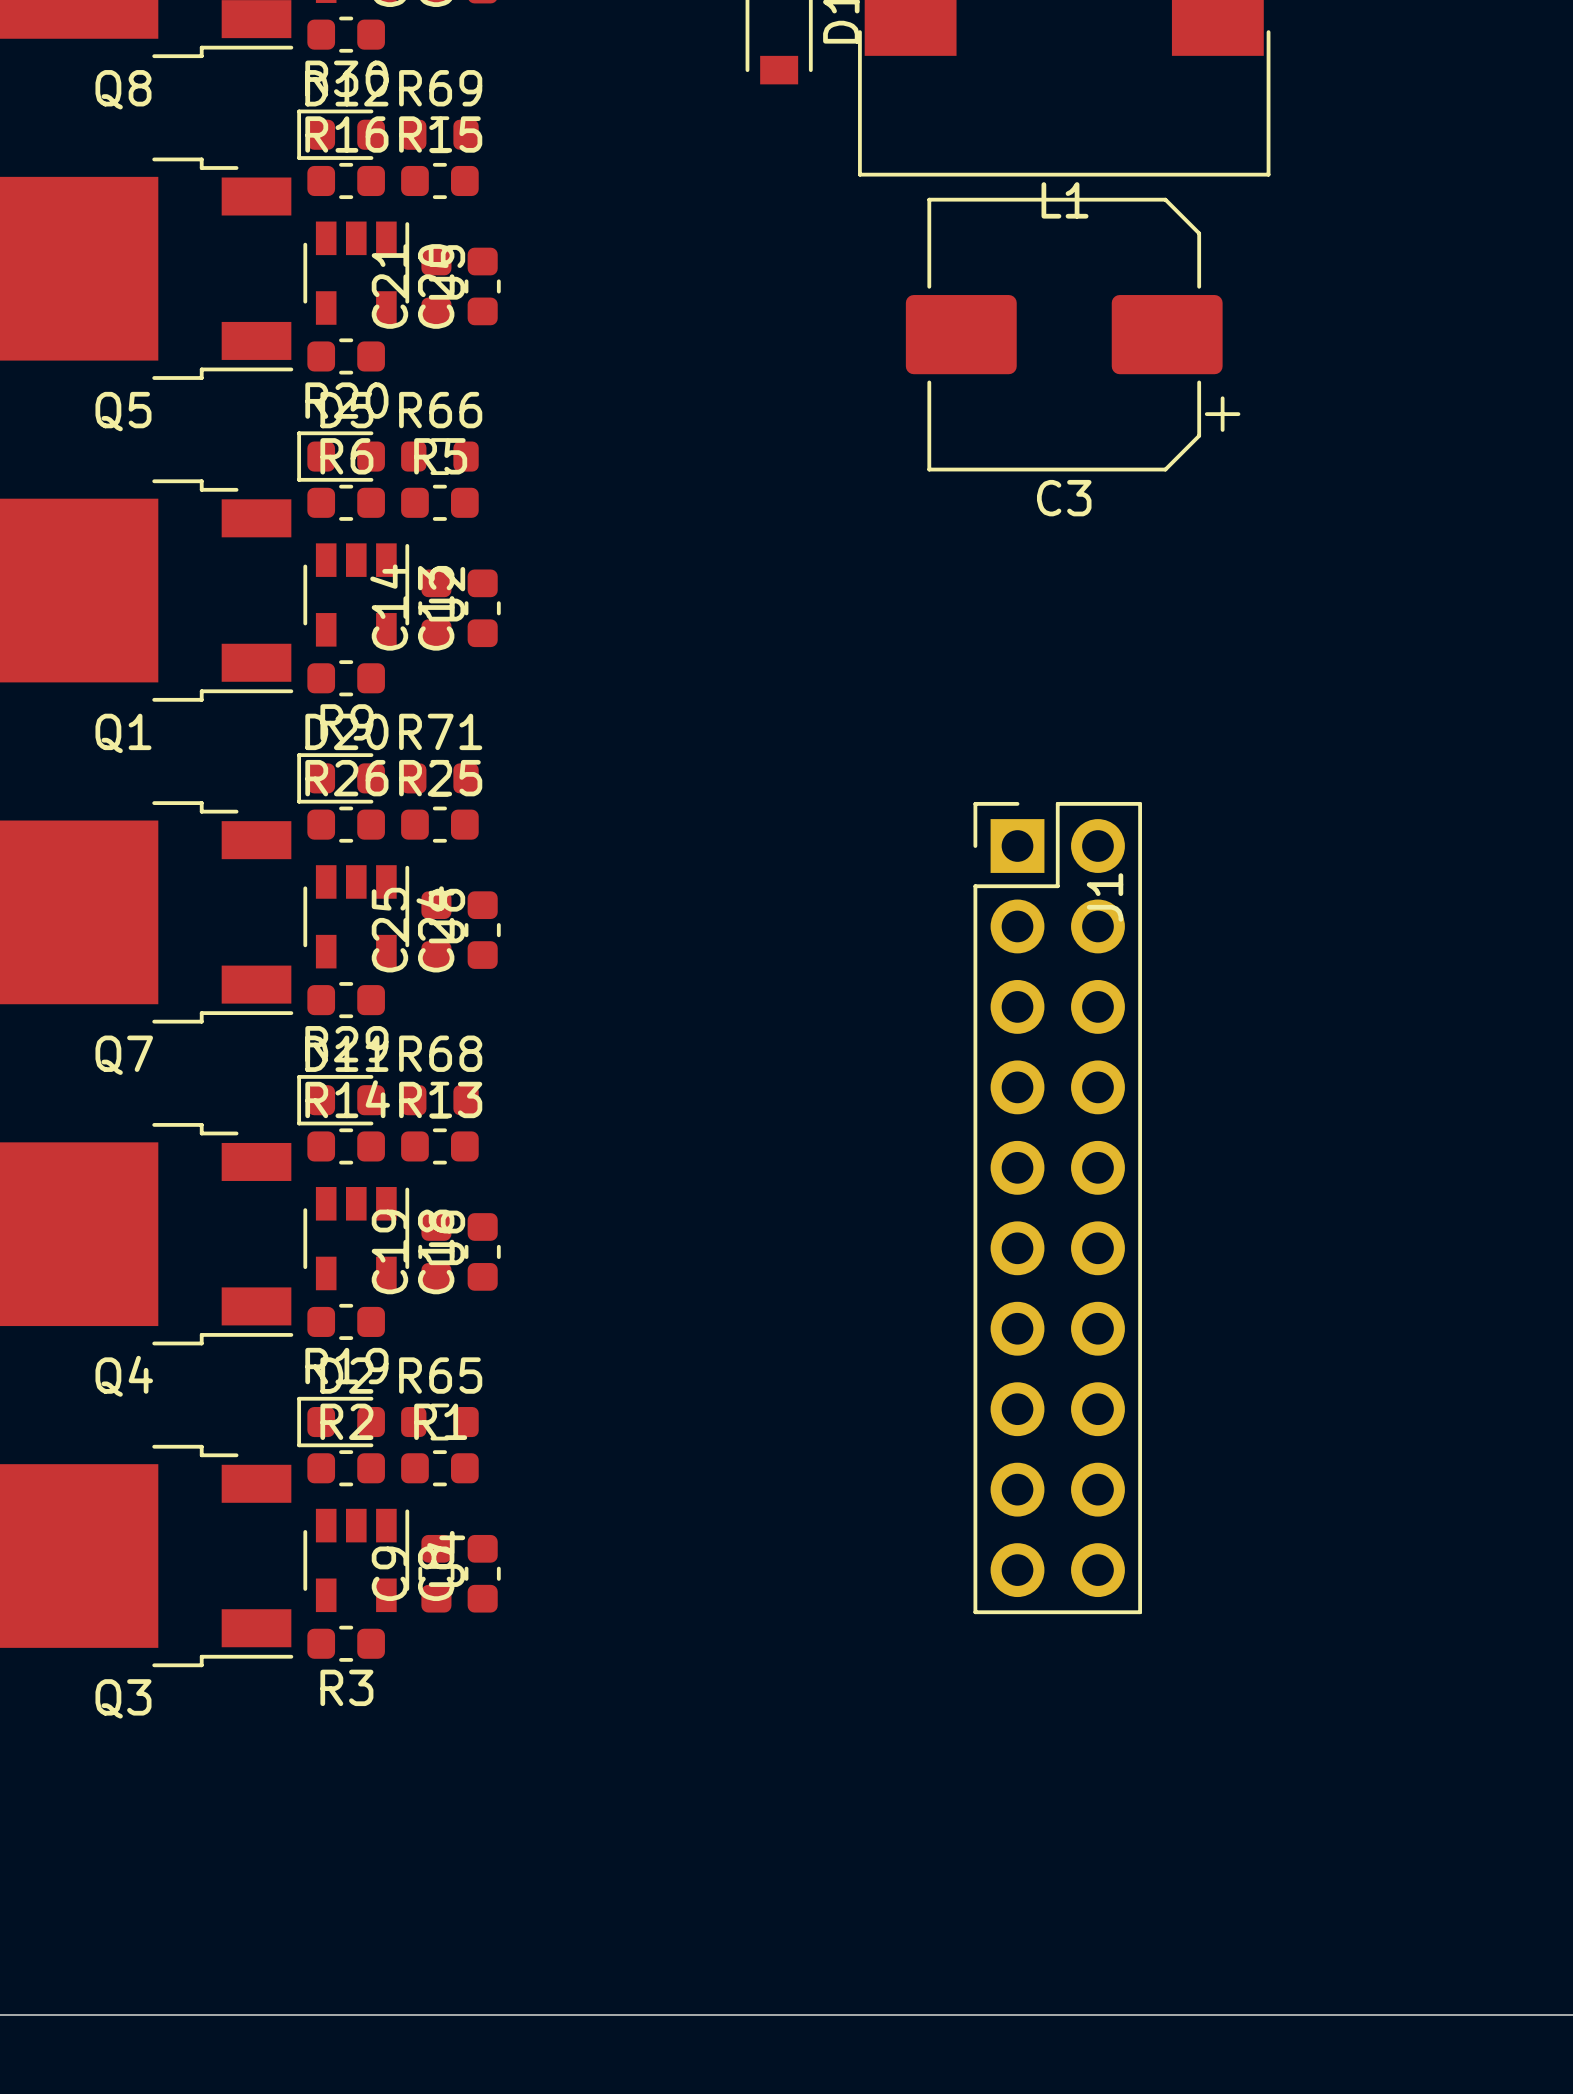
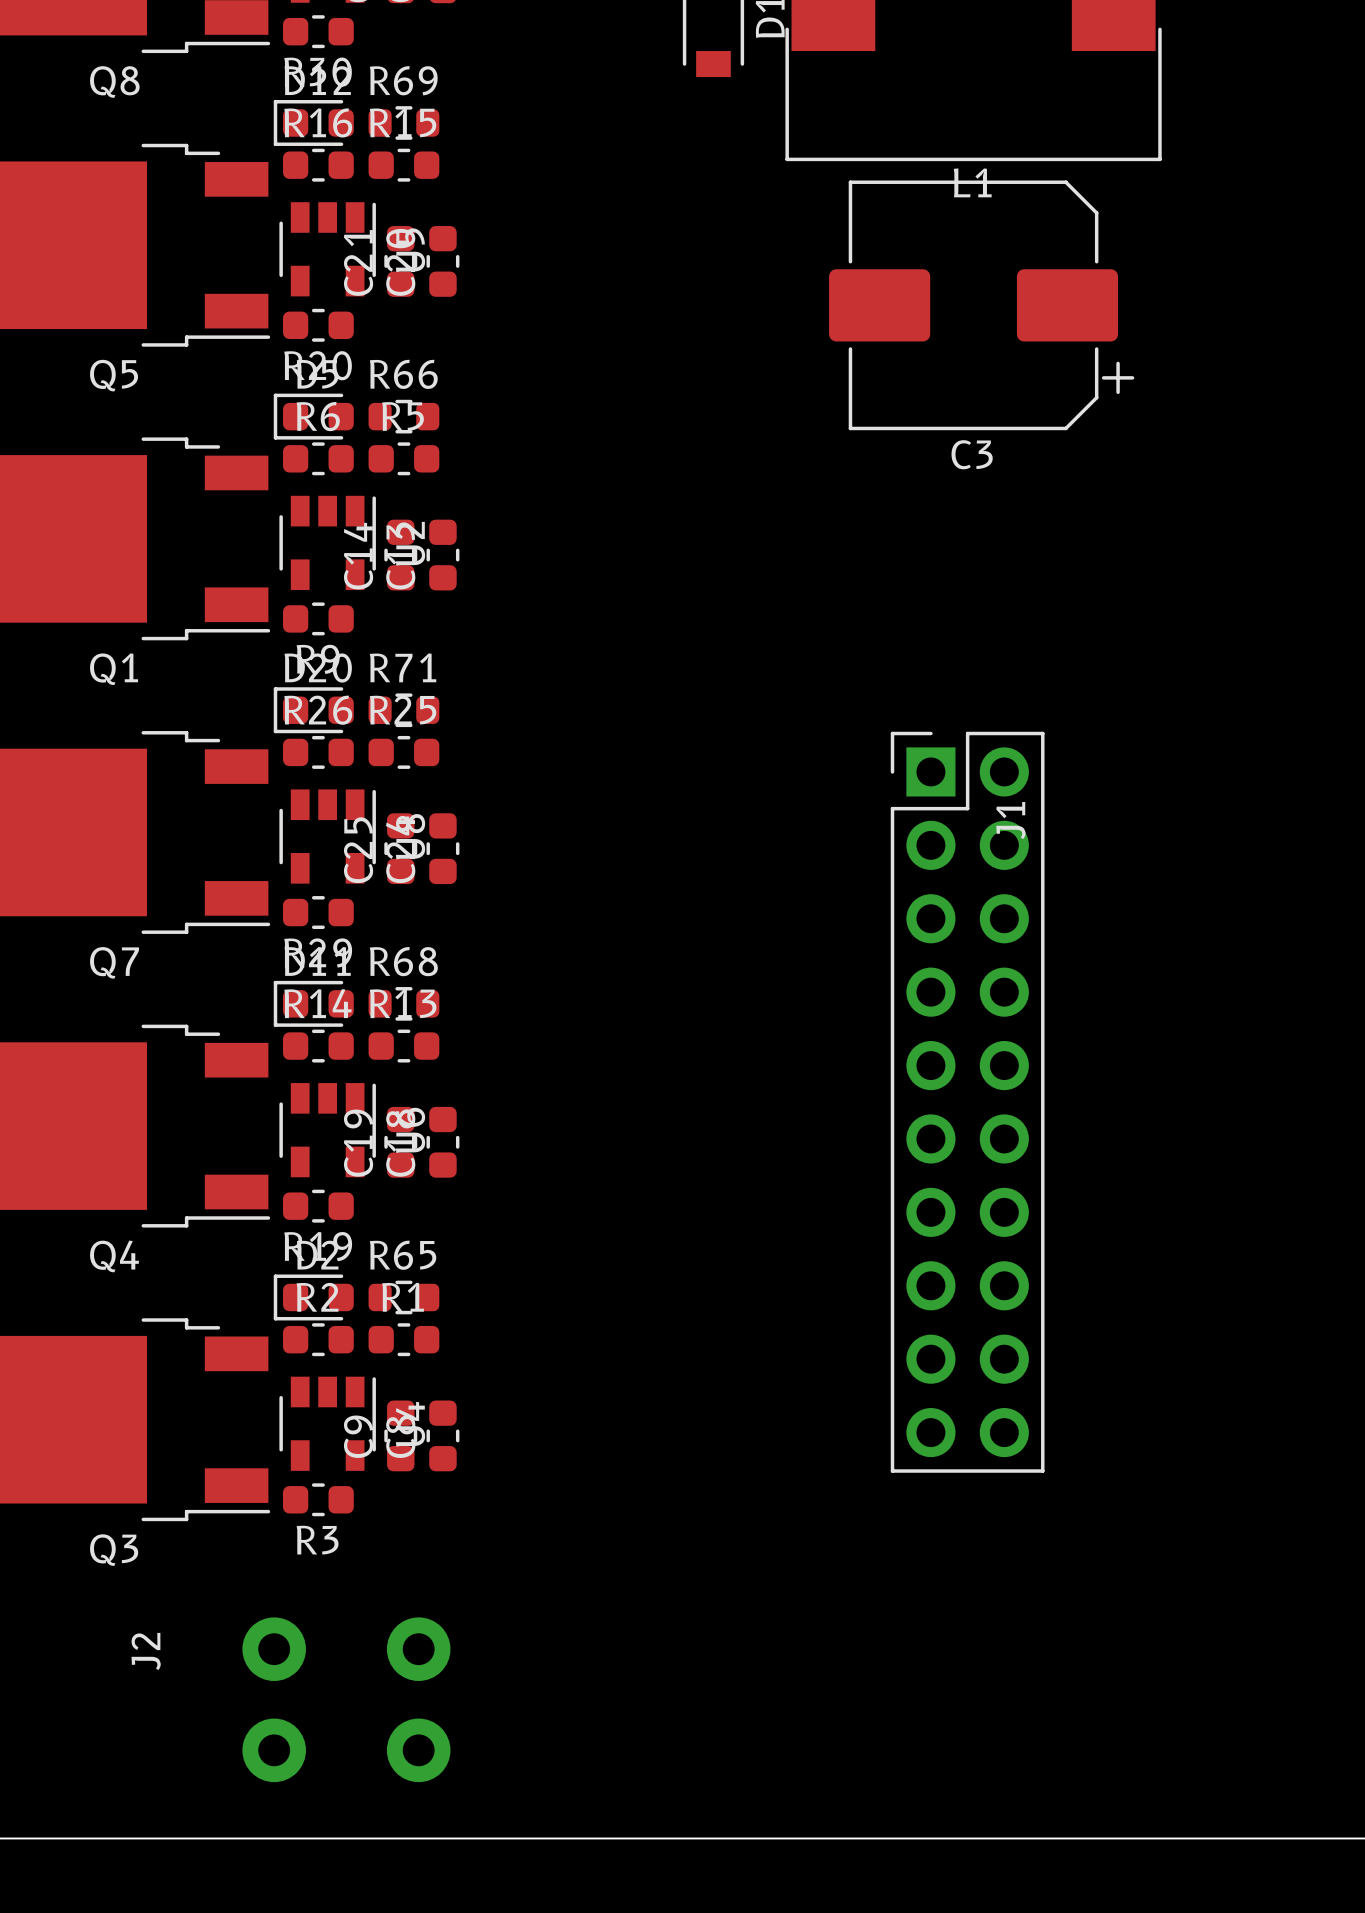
J2: none -> (346, 1699)

